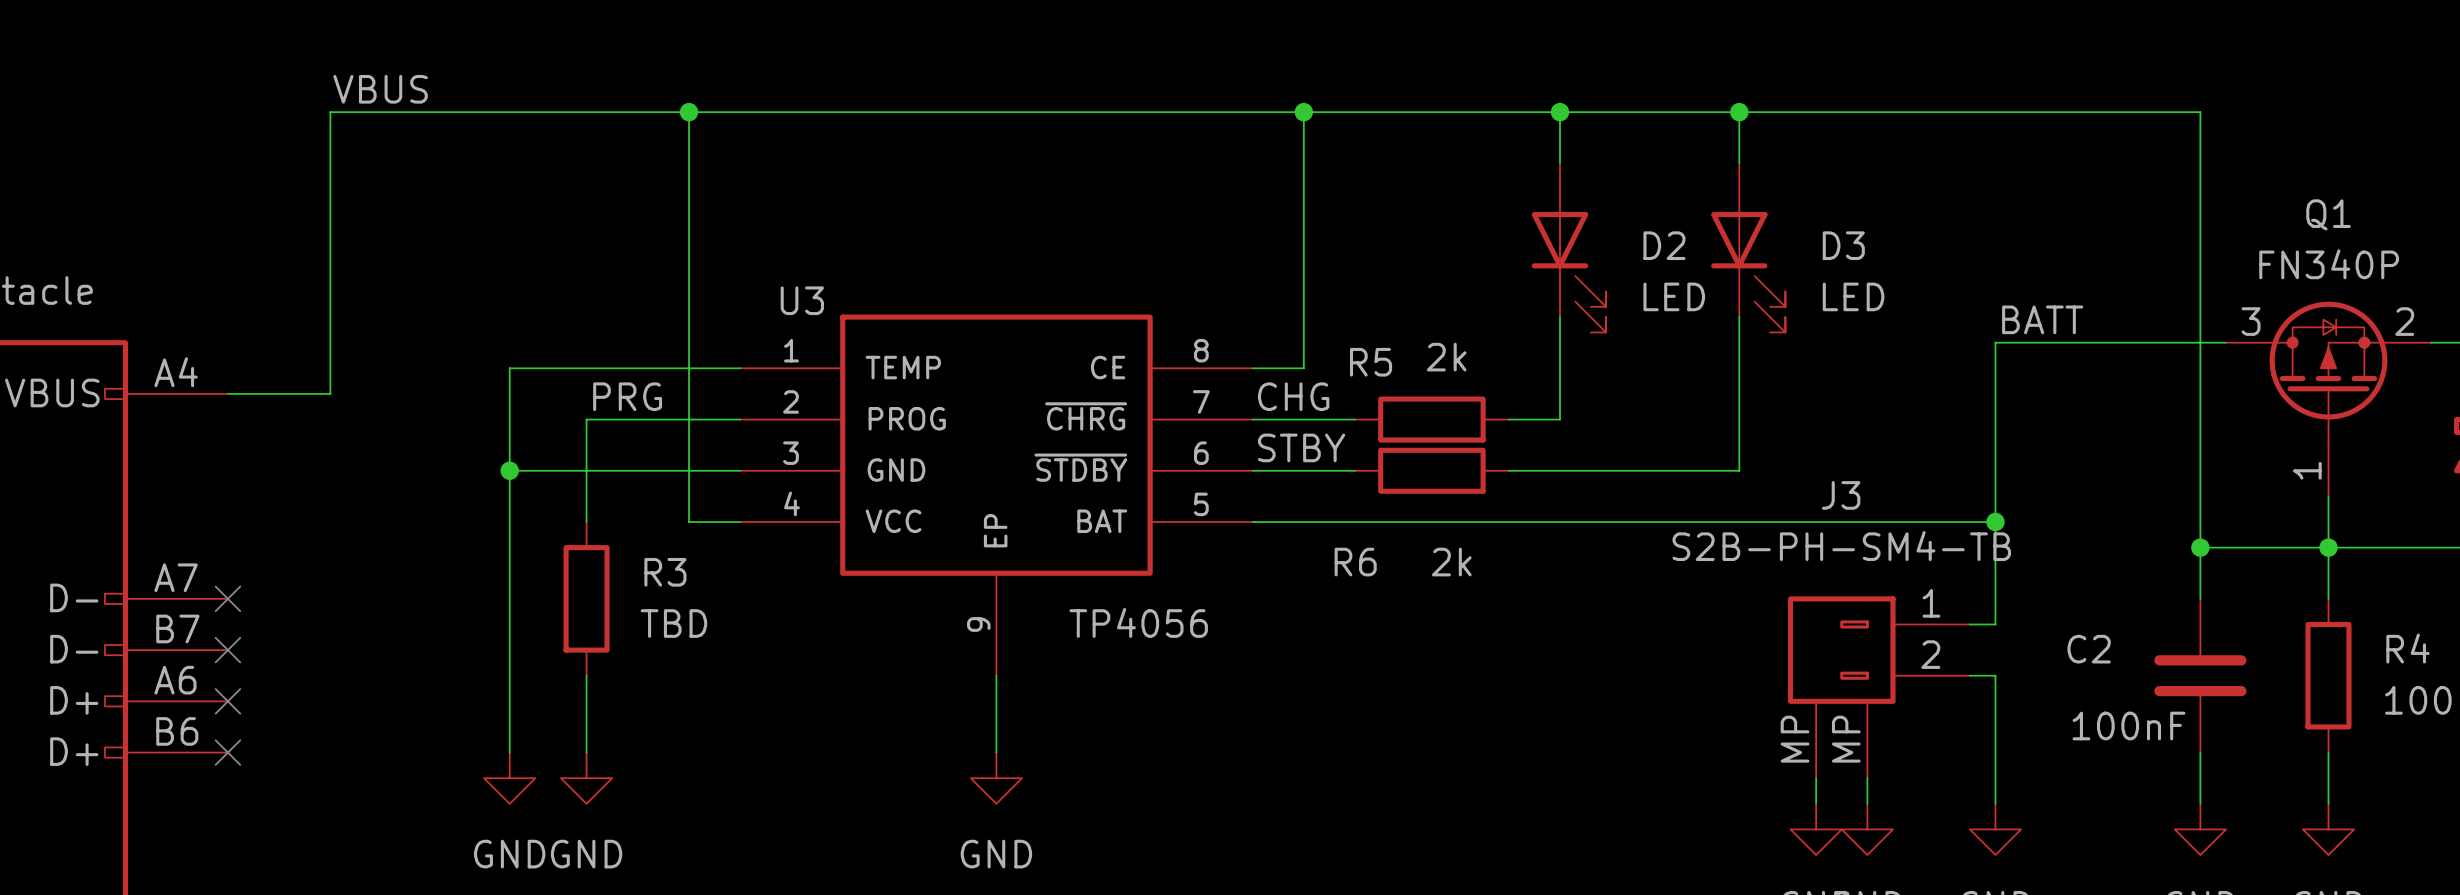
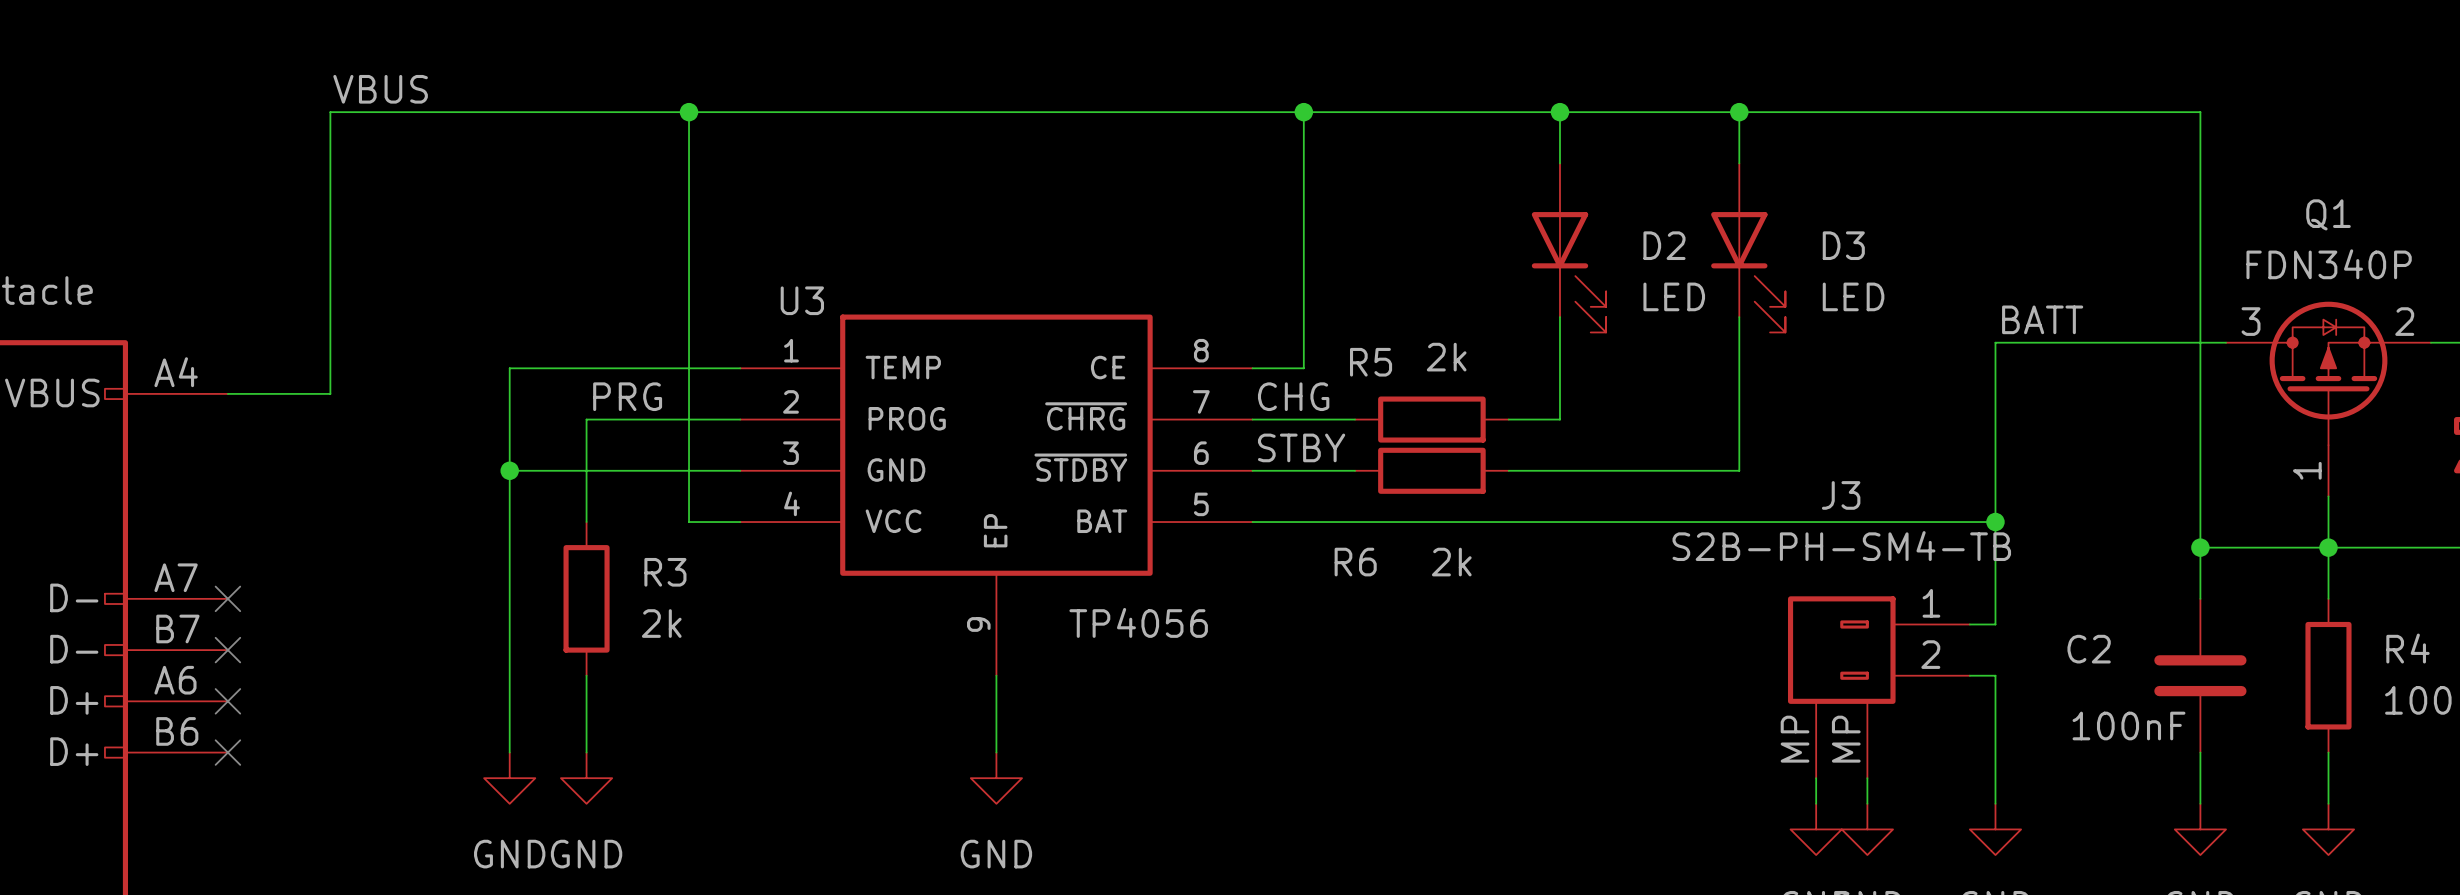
Q1 value: FN340P (2329, 264) -> FDN340P (2329, 264)
R3 value: TBD (673, 623) -> 2k (661, 623)

